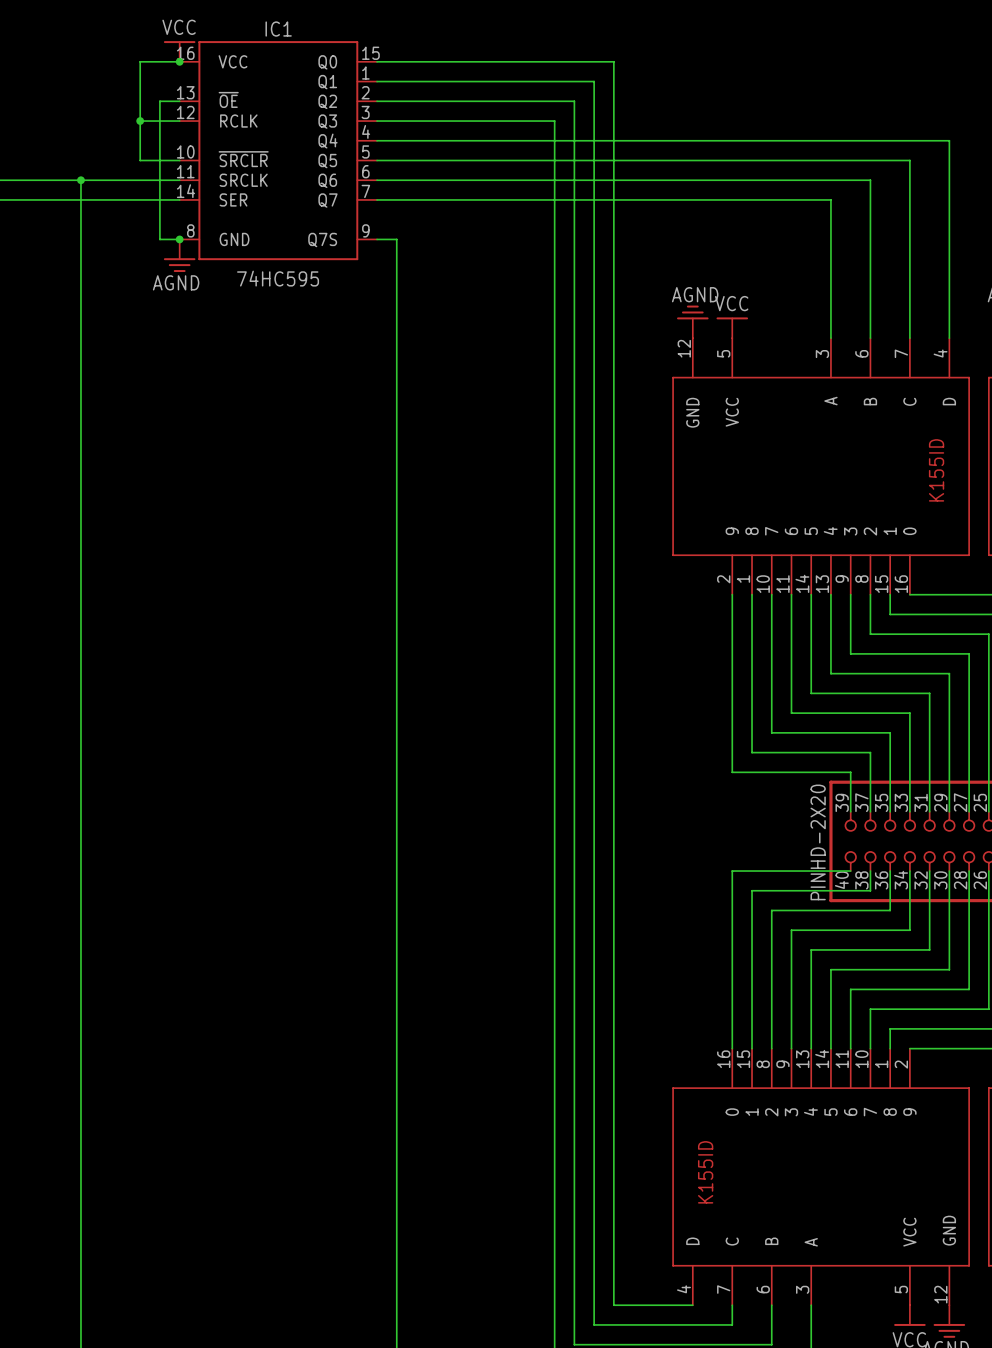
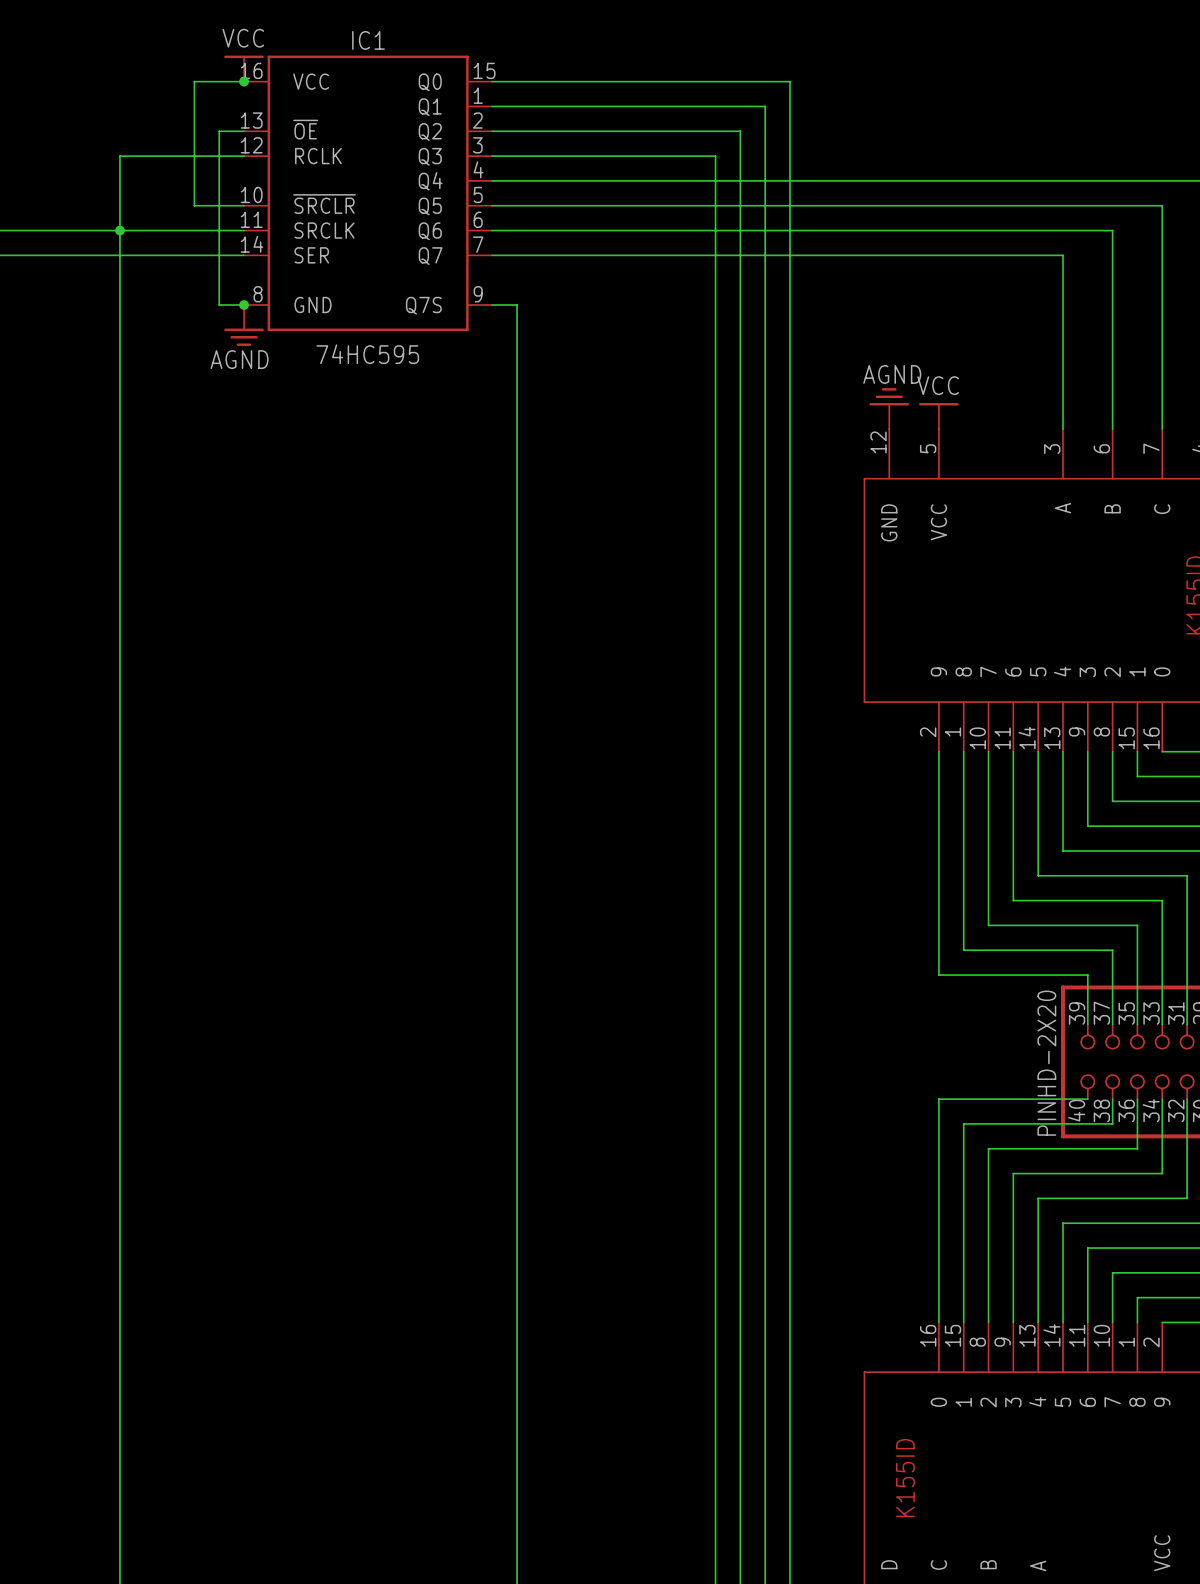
wire: none -> (194, 156) (119, 156) (119, 230)
junction: (140, 121) -> none

